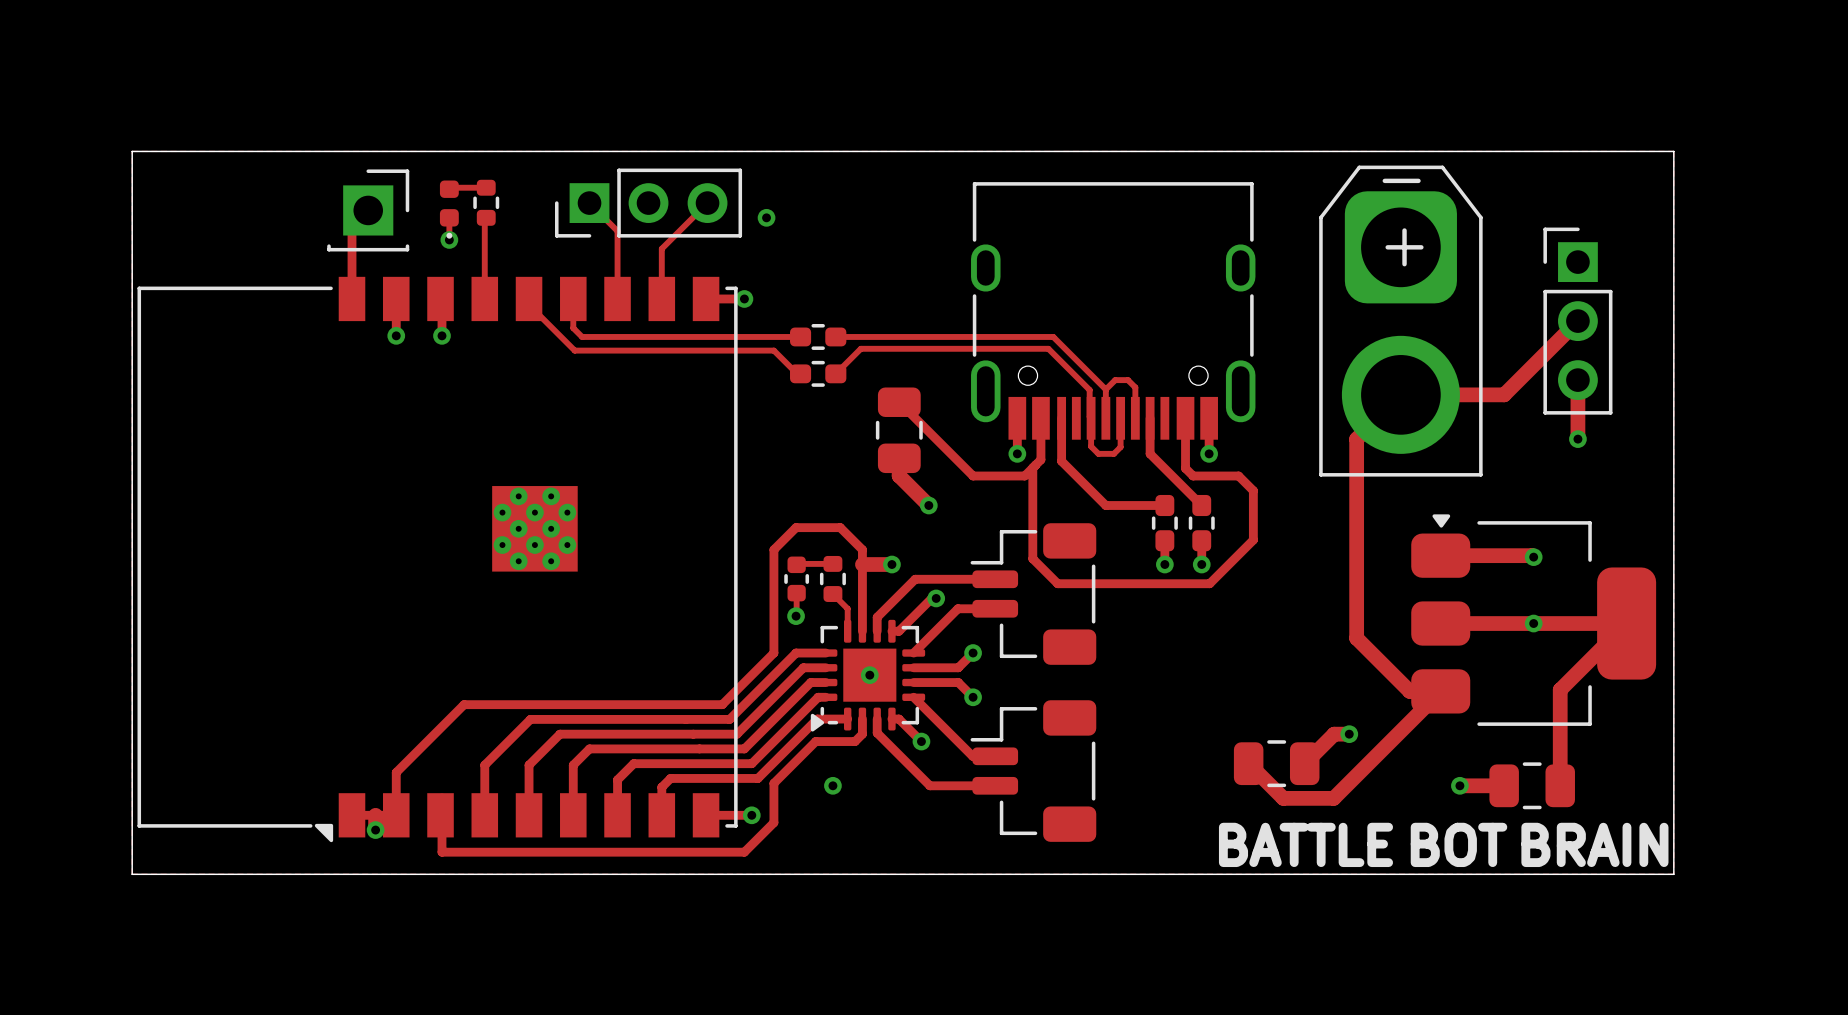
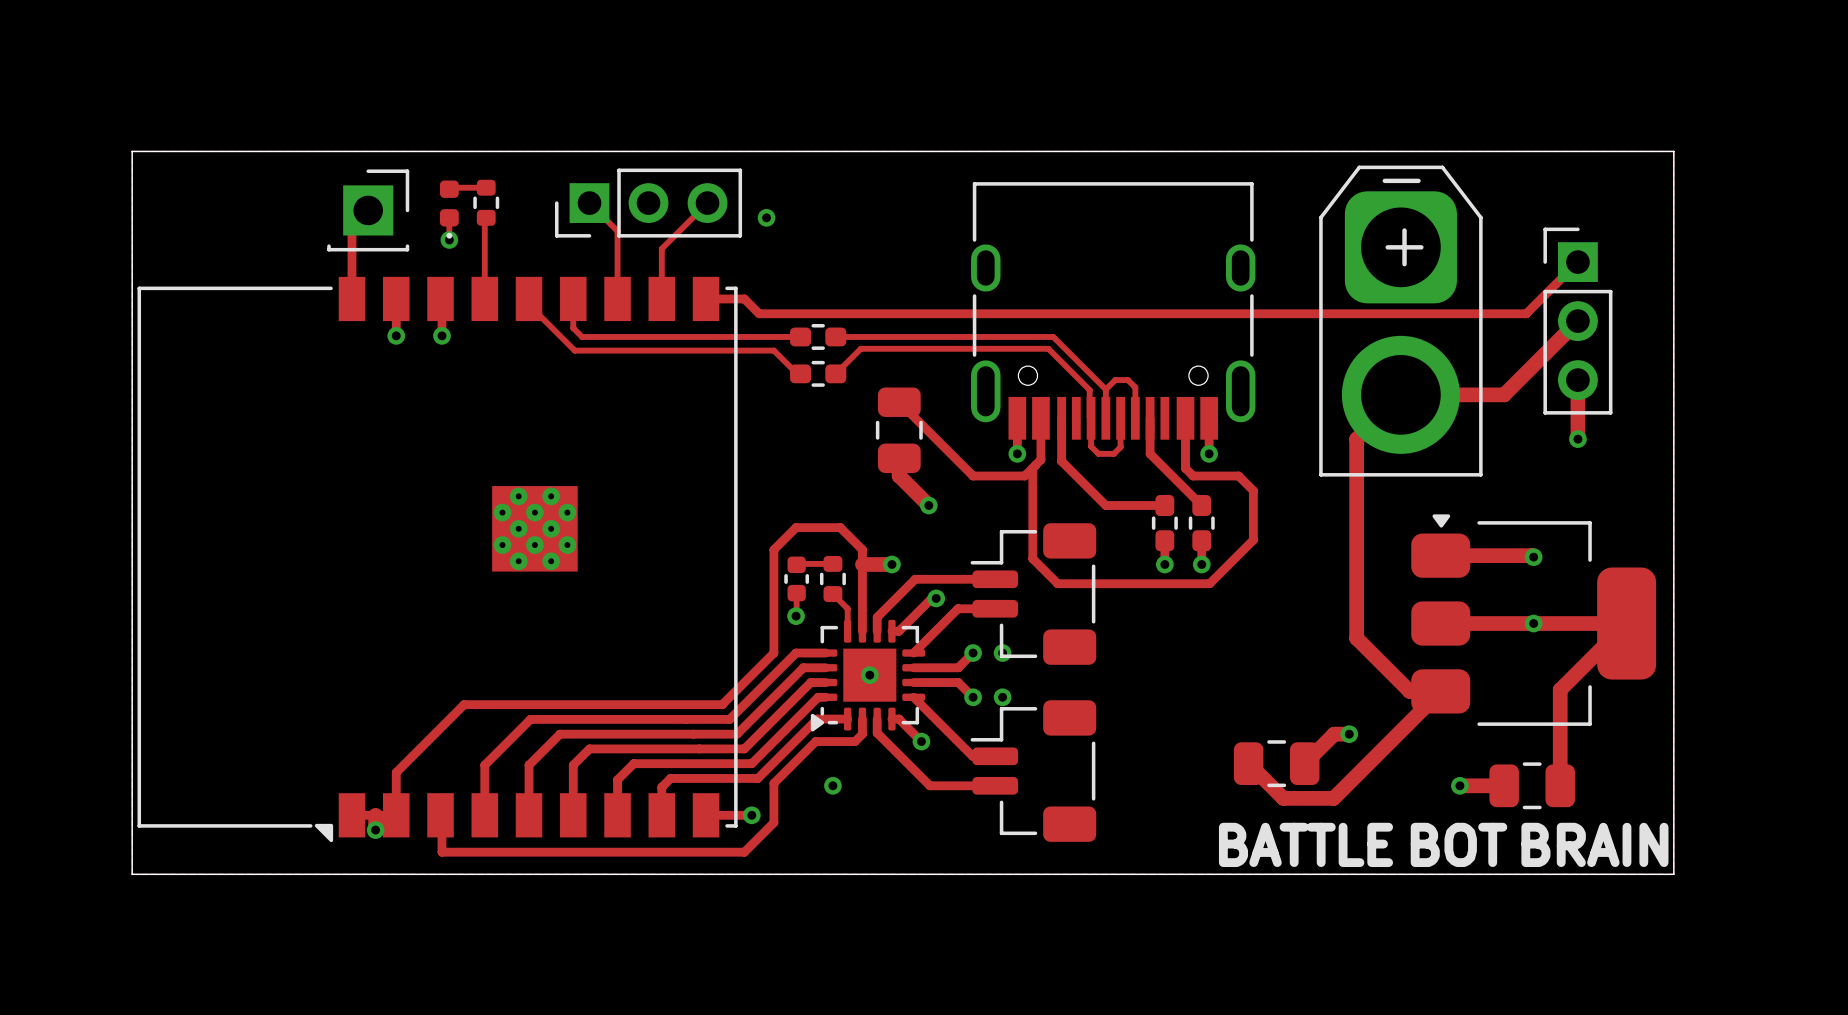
track: none -> (1577, 262) (1526, 313) (759, 313) (744, 298)
via: (744, 298) -> none
via: none -> (1002, 653)
via: none -> (1002, 697)

